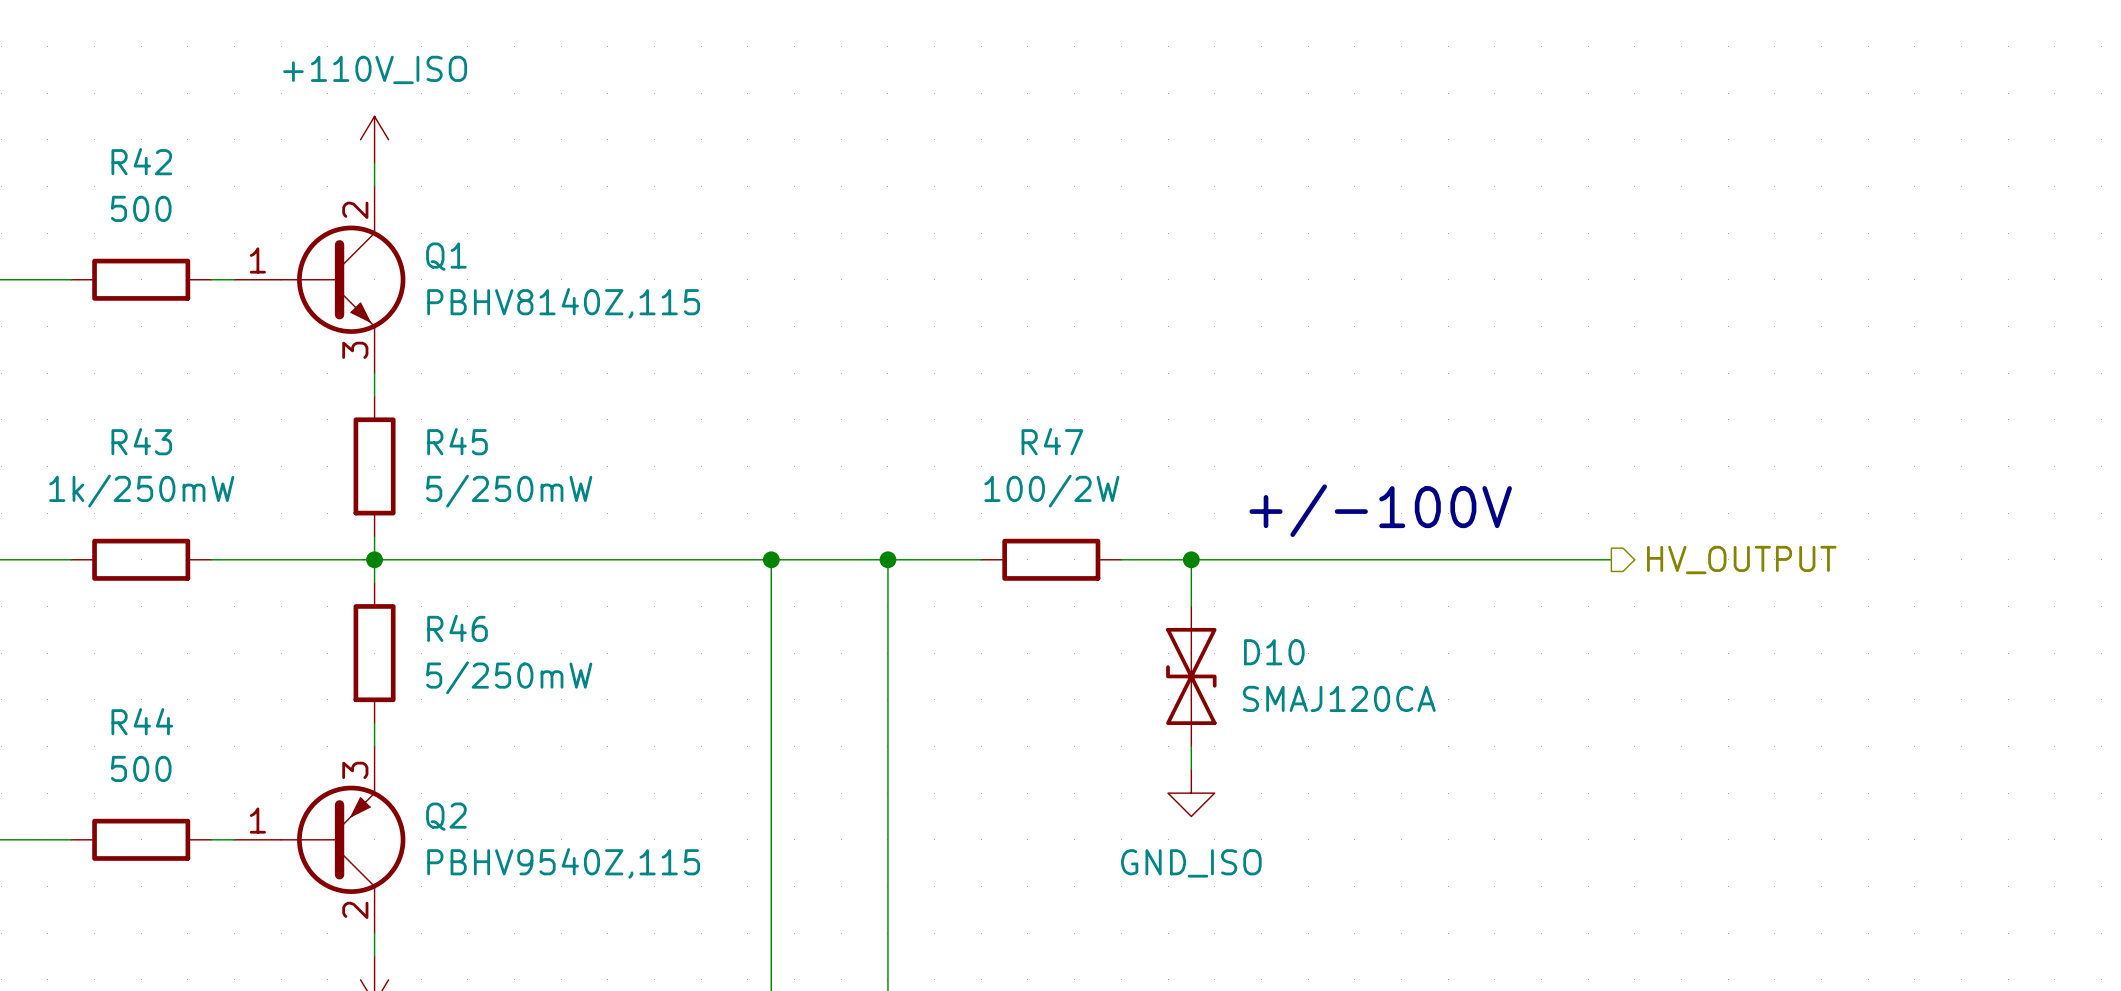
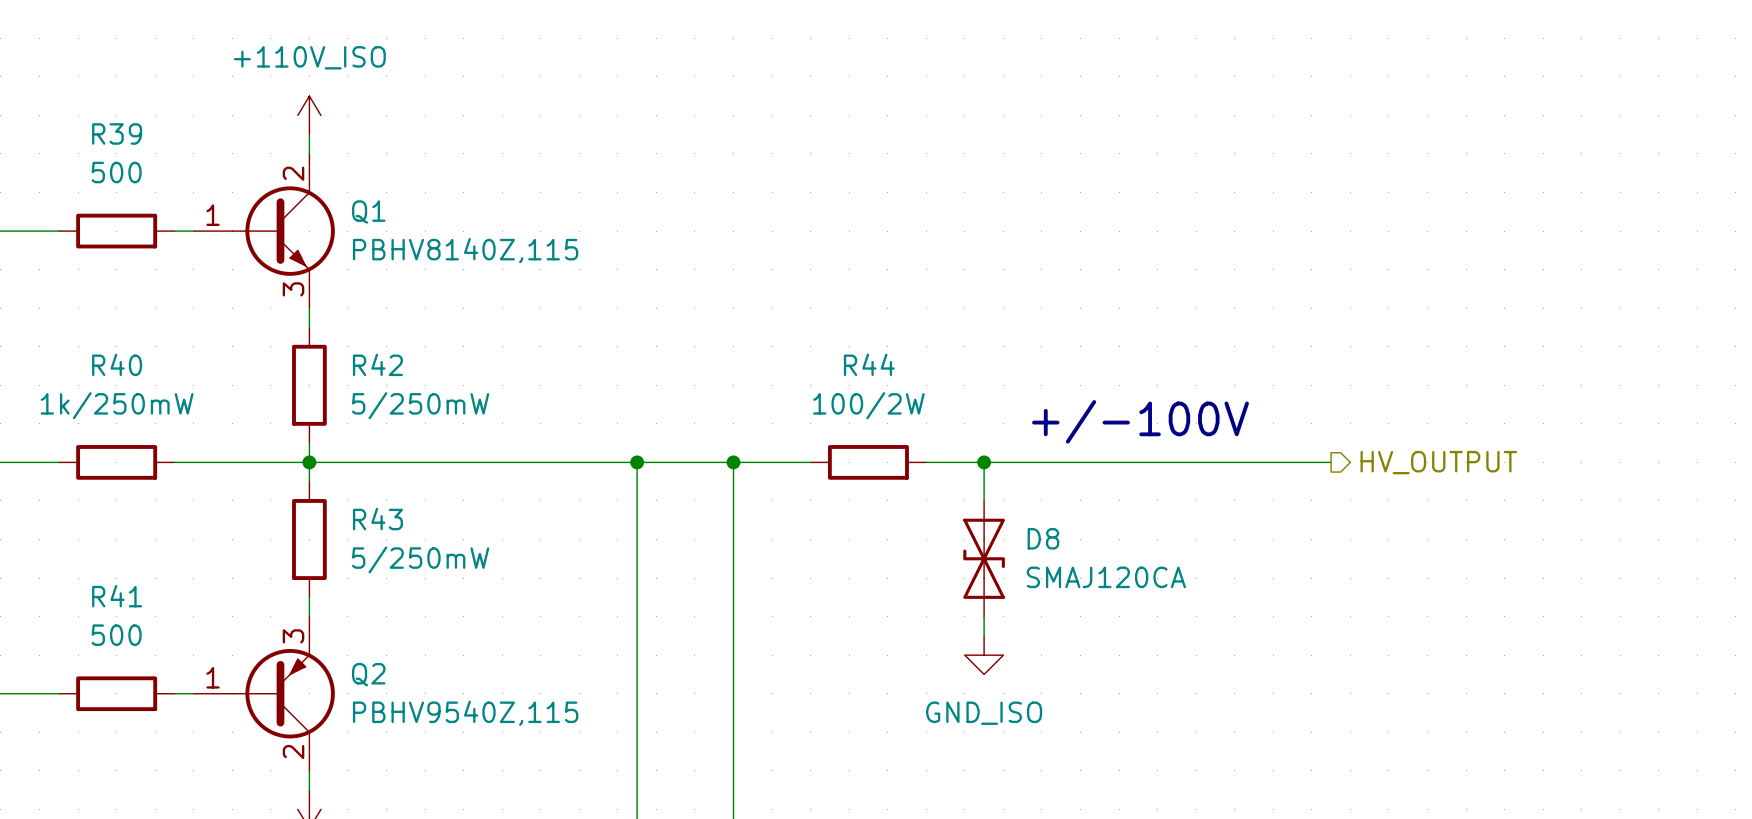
R42 name: R42 (141, 161) -> R39 (117, 133)
R43 name: R43 (141, 441) -> R40 (117, 364)
R45 name: R45 (457, 441) -> R42 (377, 364)
R47 name: R47 (1052, 441) -> R44 (869, 364)
R46 name: R46 (457, 628) -> R43 (377, 519)
D10 name: D10 (1274, 652) -> D8 (1043, 538)
R44 name: R44 (142, 721) -> R41 (117, 596)

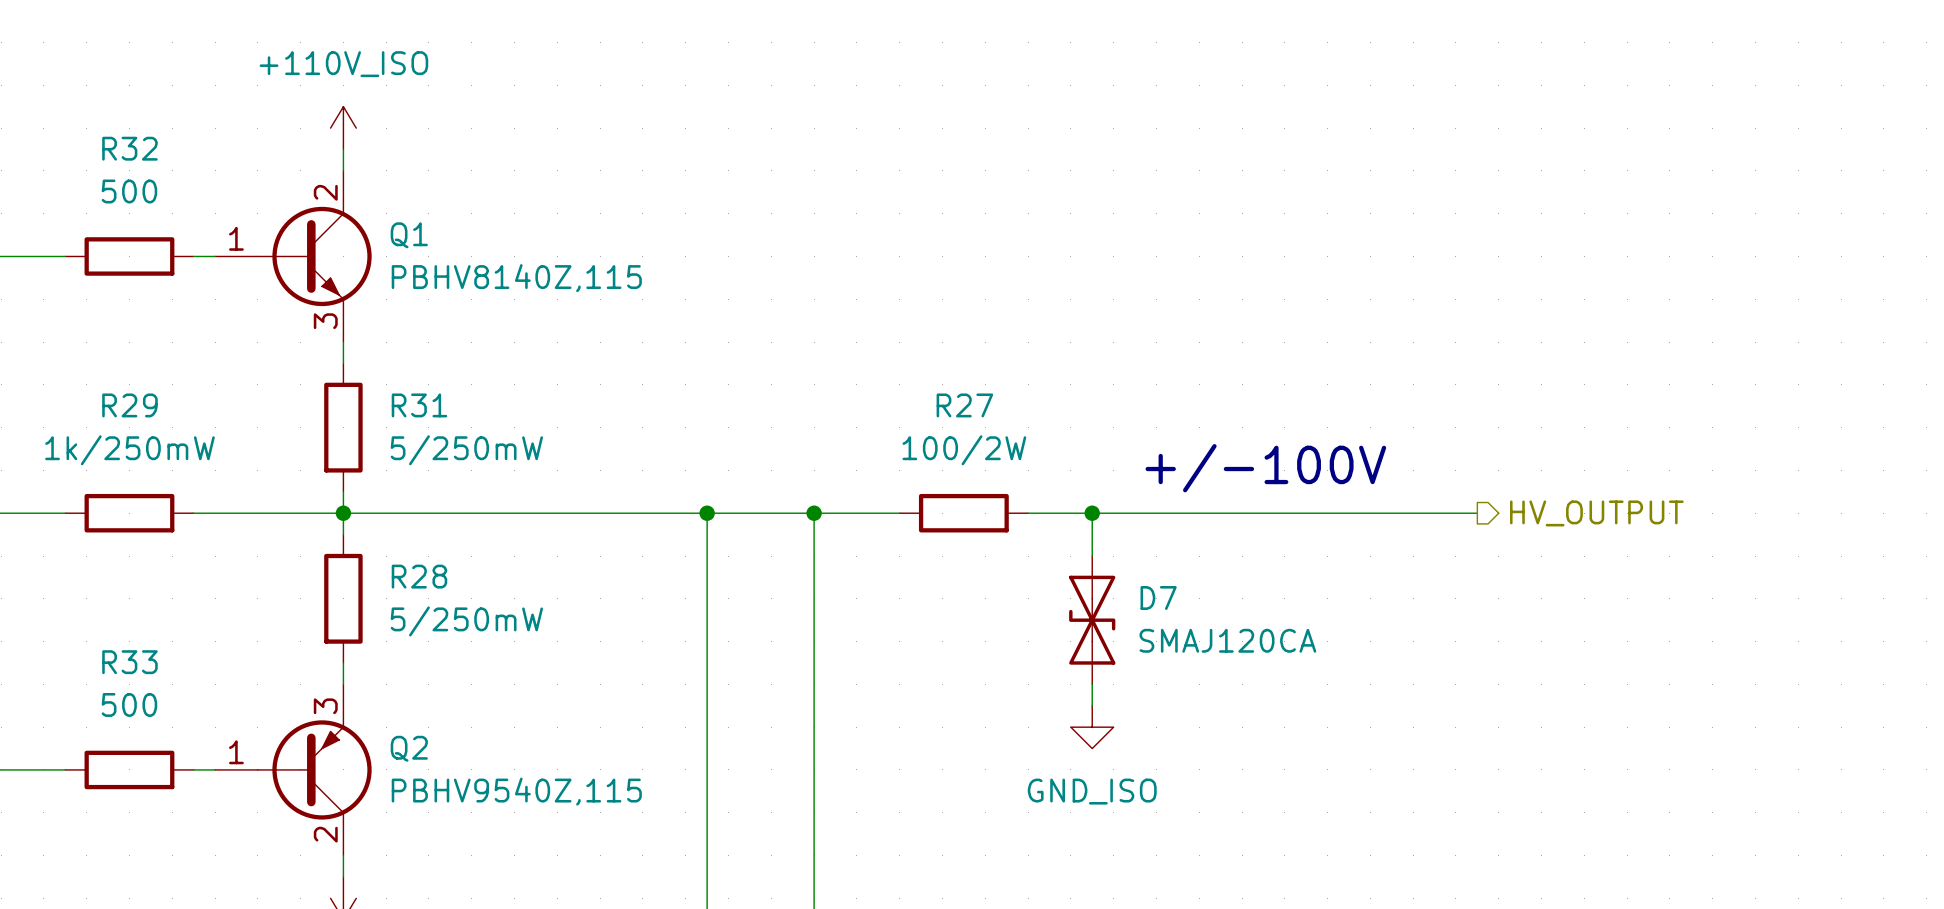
R39 name: R39 (117, 133) -> R32 (129, 148)
R40 name: R40 (117, 364) -> R29 (129, 405)
R42 name: R42 (377, 364) -> R31 (419, 405)
R44 name: R44 (869, 364) -> R27 (964, 405)
R43 name: R43 (377, 519) -> R28 (419, 576)
D8 name: D8 (1043, 538) -> D7 (1158, 597)
R41 name: R41 (117, 596) -> R33 (129, 662)

